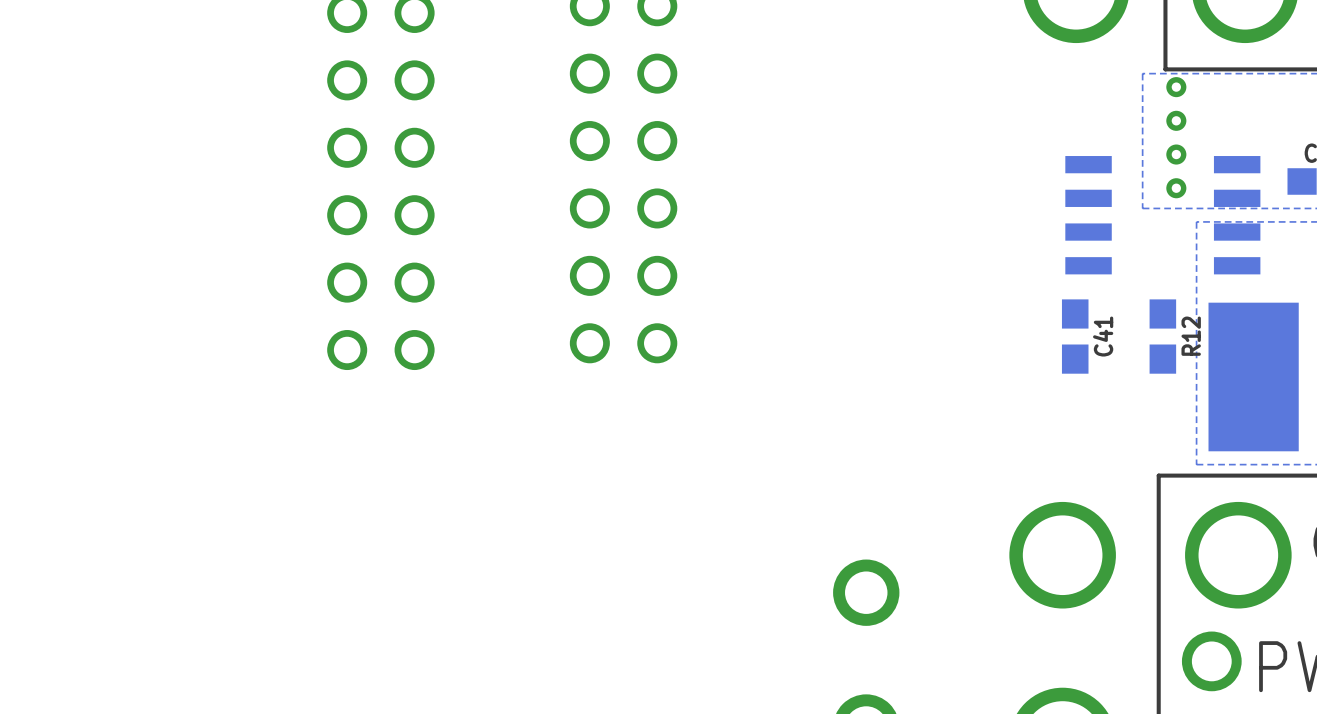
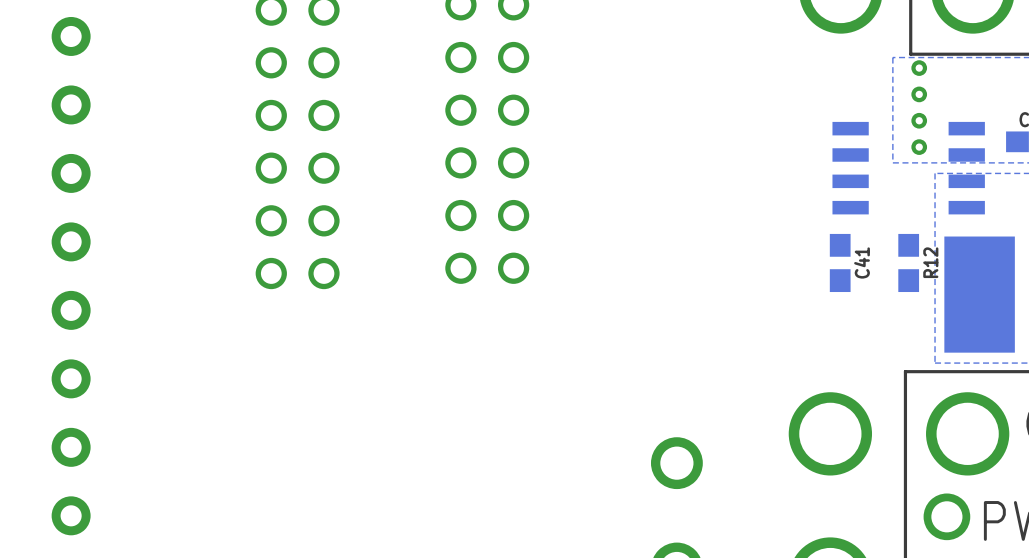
part: none -> (71, 36)
part: none -> (71, 104)
part: none -> (71, 173)
part: none -> (71, 241)
part: none -> (71, 310)
part: none -> (71, 378)
part: none -> (71, 447)
part: none -> (71, 515)

